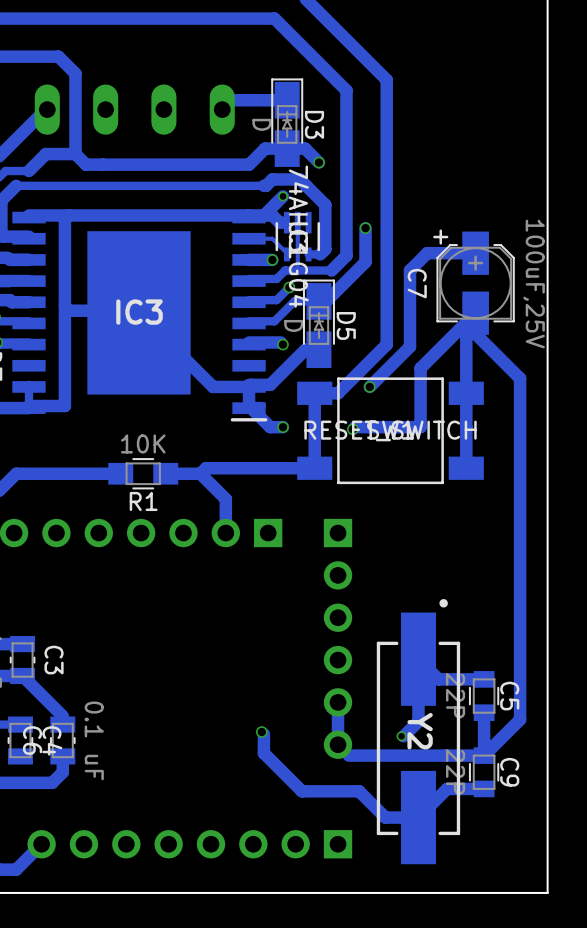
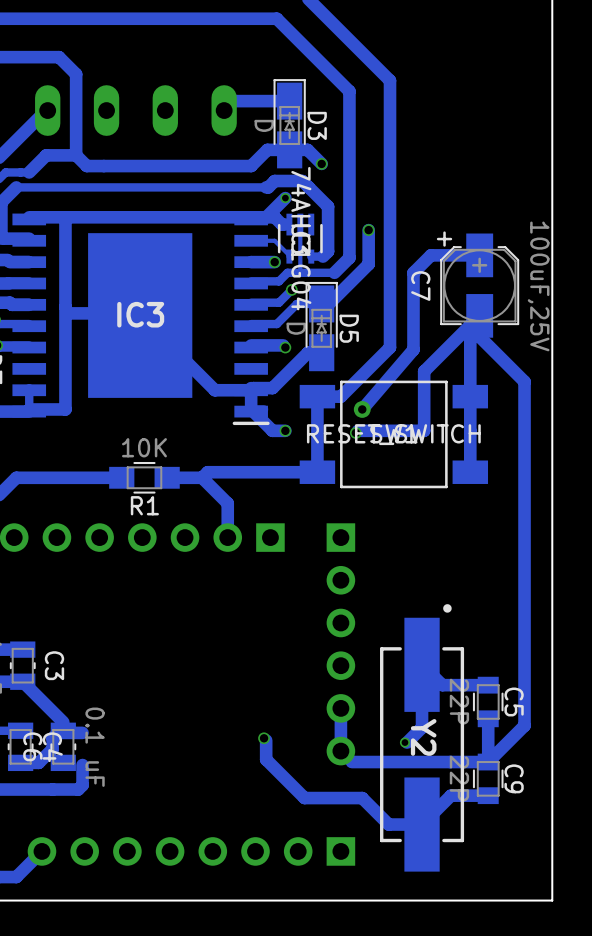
track: (410, 346) (369, 386) -> (413, 349) (362, 409)
via: (369, 386) -> none
via: none -> (362, 409)
track: none -> (82, 732) (58, 732) (52, 738) (52, 748) (38, 762) (20, 762)
track: (62, 756) (62, 772) (52, 782) -> (82, 765) (82, 785) (78, 789) (52, 789)

